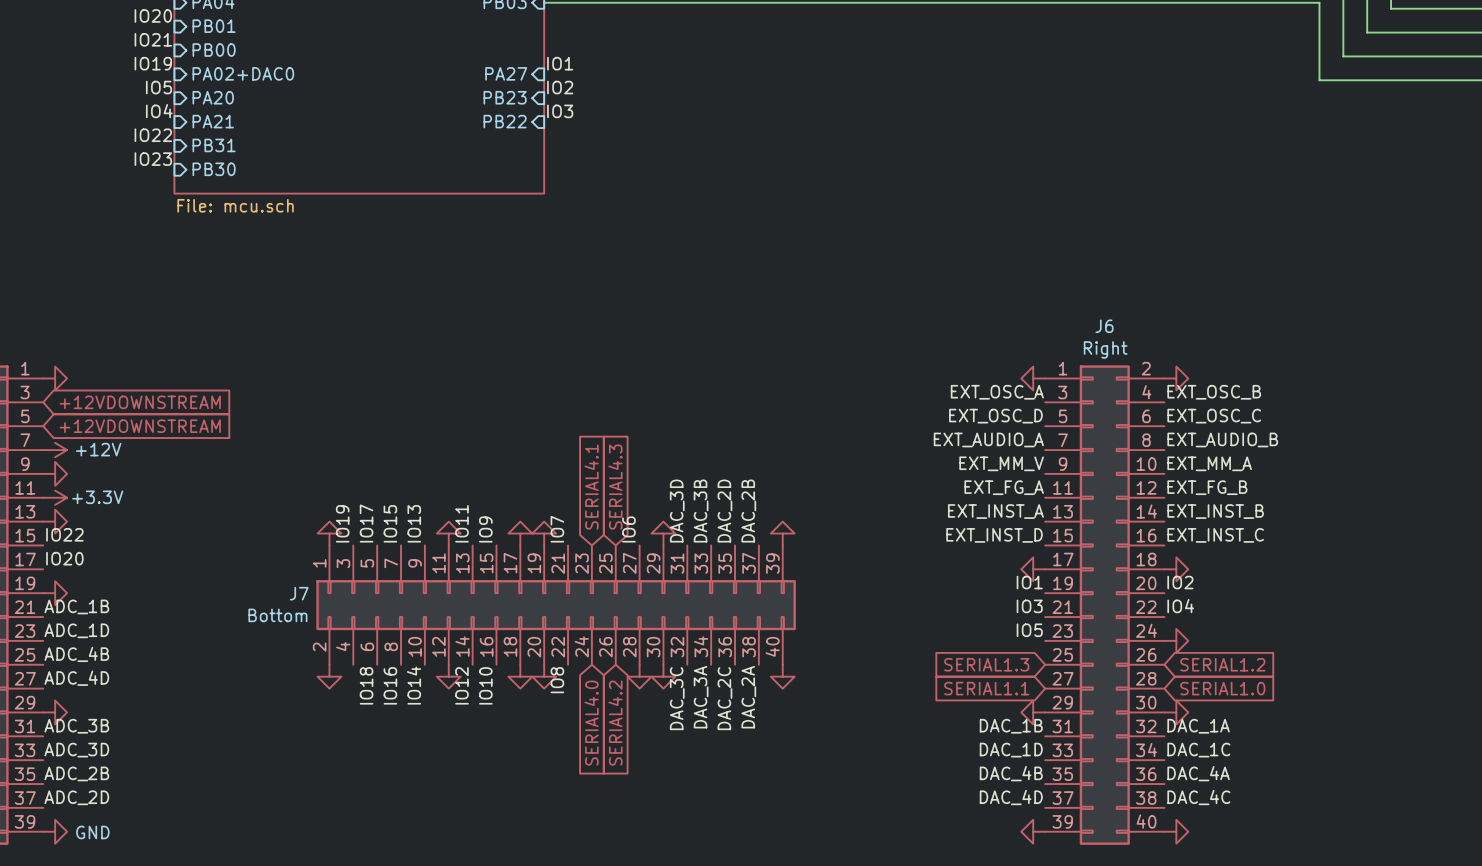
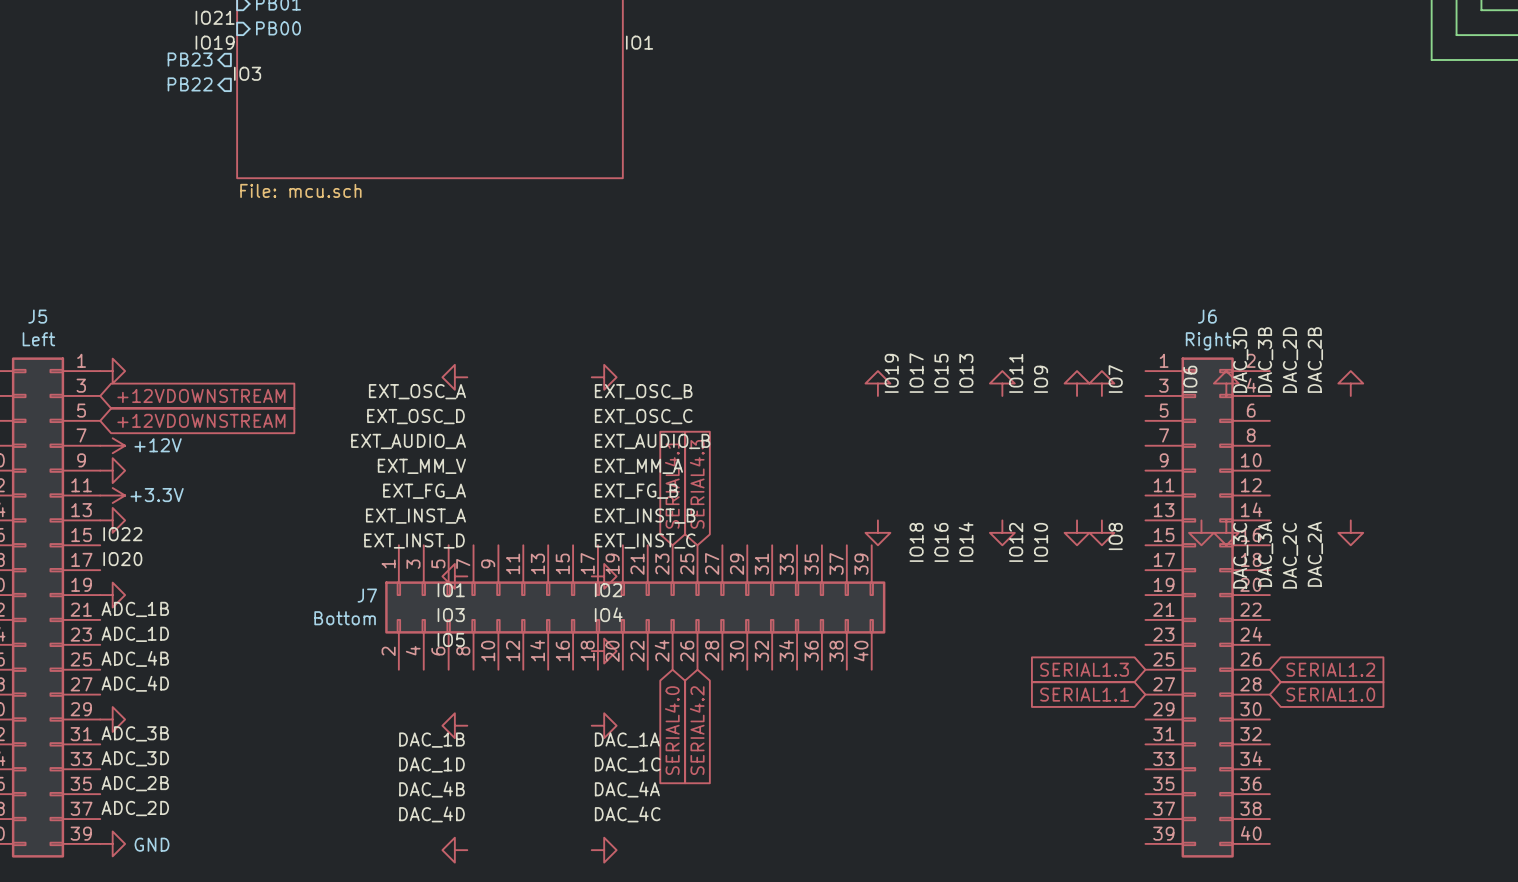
sheet pin: PA02+DAC0 (243, 73) -> none
sheet pin: PA27 (506, 73) -> none
sheet pin: none -> PB23 (190, 59)
label: IO5 (158, 87) -> IO3 (247, 73)
label: IO2 (560, 87) -> none
sheet pin: PA20 (213, 97) -> none
sheet pin: PB23 (505, 97) -> none
sheet pin: none -> PB22 (190, 84)
label: IO4 (159, 111) -> none
label: IO3 (560, 111) -> none
sheet pin: PA21 (213, 121) -> none
sheet pin: PB22 (505, 121) -> none
label: IO22 (153, 135) -> none
sheet pin: PB31 (214, 145) -> none
label: IO23 (153, 159) -> none
sheet pin: PB30 (214, 169) -> none
label: none -> DAC_3D (1240, 360)
label: none -> DAC_2D (1290, 360)
label: none -> DAC_2B (1315, 360)
power symbol: (1033, 378) -> none
power symbol: (1176, 378) -> none
label: none -> IO19 (891, 373)
label: none -> IO17 (916, 373)
label: none -> IO15 (941, 373)
label: none -> IO13 (966, 373)
label: none -> IO11 (1016, 373)
power symbol: none -> (454, 377)
power symbol: none -> (604, 377)
label: none -> IO9 (1041, 379)
label: none -> IO7 (1115, 378)
label: none -> IO6 (1190, 379)
power symbol: none -> (877, 383)
power symbol: none -> (1002, 383)
power symbol: none -> (1077, 383)
power symbol: none -> (1101, 383)
power symbol: none -> (1226, 383)
power symbol: none -> (1350, 383)
label: EXT_OSC_A (997, 392) -> none
label: EXT_OSC_B (1214, 392) -> DAC_3B (1265, 360)
label: none -> EXT_OSC_A (417, 391)
label: none -> EXT_OSC_B (643, 391)
label: EXT_OSC_D (995, 416) -> none
label: EXT_OSC_C (1214, 416) -> none
label: none -> EXT_OSC_D (415, 416)
label: none -> EXT_OSC_C (643, 416)
label: EXT_AUDIO_A (988, 439) -> none
label: EXT_AUDIO_B (1222, 439) -> none
label: none -> EXT_AUDIO_A (408, 441)
label: none -> EXT_AUDIO_B (652, 441)
label: EXT_MM_V (1001, 463) -> none
label: EXT_MM_A (1209, 463) -> none
label: none -> EXT_MM_V (421, 466)
label: none -> EXT_MM_A (638, 466)
label: EXT_FG_A (1004, 487) -> none
label: EXT_FG_B (1207, 487) -> none
label: none -> EXT_FG_A (424, 491)
label: none -> EXT_FG_B (636, 491)
label: DAC_3D (677, 511) -> none
label: DAC_3B (701, 511) -> none
label: DAC_2D (724, 511) -> none
label: DAC_2B (748, 511) -> none
label: EXT_INST_A (995, 511) -> none
label: EXT_INST_B (1215, 511) -> DAC_3A (1265, 554)
label: none -> EXT_INST_A (415, 516)
label: none -> EXT_INST_B (645, 516)
label: IO19 (342, 523) -> none
label: IO17 (366, 523) -> none
label: IO15 (390, 523) -> EXT_INST_D (414, 541)
label: IO13 (414, 523) -> none
label: IO11 (461, 523) -> none
label: IO9 (485, 529) -> none
label: IO7 (557, 529) -> none
label: IO6 (628, 529) -> none
power symbol: (329, 533) -> none
power symbol: (448, 533) -> none
power symbol: (520, 533) -> none
power symbol: (544, 533) -> none
power symbol: (663, 533) -> none
power symbol rotation: 0° (782, 533) -> 180° (877, 532)
power symbol: none -> (1002, 532)
power symbol: none -> (1077, 532)
power symbol: none -> (1101, 532)
power symbol: none -> (1201, 532)
power symbol: none -> (1226, 532)
power symbol: none -> (1350, 532)
label: EXT_INST_D (994, 535) -> none
label: EXT_INST_C (1215, 535) -> none
label: none -> IO8 (1115, 536)
label: none -> EXT_INST_C (645, 541)
label: none -> IO18 (916, 542)
label: none -> IO16 (941, 542)
label: none -> IO14 (966, 542)
label: none -> IO12 (1016, 542)
label: none -> IO10 (1041, 542)
label: none -> DAC_2A (1315, 554)
label: none -> DAC_3C (1240, 555)
label: none -> DAC_2C (1290, 555)
power symbol: (1033, 569) -> none
power symbol: (1176, 569) -> none
power symbol: none -> (454, 576)
power symbol: none -> (604, 576)
label: IO1 (1029, 582) -> none
label: IO2 (1180, 582) -> none
label: none -> IO1 (451, 590)
label: none -> IO2 (608, 590)
label: IO3 (1029, 606) -> none
label: IO4 (1180, 606) -> none
label: none -> IO3 (451, 615)
label: none -> IO4 (608, 614)
label: IO5 (1029, 630) -> none
label: none -> IO5 (451, 639)
power symbol: (1176, 640) -> none
power symbol: none -> (604, 651)
power symbol: (329, 676) -> none
power symbol: (448, 676) -> none
power symbol: (520, 676) -> none
power symbol: (544, 676) -> none
power symbol: (639, 676) -> none
power symbol: (663, 676) -> none
power symbol: (782, 676) -> none
label: IO8 (557, 680) -> none
label: IO18 (366, 685) -> none
label: IO16 (390, 685) -> none
label: IO14 (413, 685) -> none
label: IO12 (461, 685) -> none
label: IO10 (485, 685) -> none
label: DAC_3A (701, 697) -> none
label: DAC_2A (748, 697) -> none
label: DAC_3C (677, 698) -> none
label: DAC_2C (724, 698) -> none
power symbol: (1033, 712) -> none
power symbol: (1176, 712) -> none
power symbol: none -> (454, 725)
power symbol: none -> (604, 725)
label: DAC_1B (1011, 726) -> none
label: DAC_1A (1198, 726) -> none
label: none -> DAC_1B (431, 740)
label: none -> DAC_1A (627, 740)
label: DAC_1D (1011, 750) -> none
label: DAC_1C (1198, 750) -> none
label: none -> DAC_1D (431, 764)
label: none -> DAC_1C (627, 764)
label: DAC_4B (1011, 773) -> none
label: DAC_4A (1198, 773) -> none
label: none -> DAC_4B (431, 789)
label: none -> DAC_4A (627, 789)
label: DAC_4D (1011, 797) -> none
label: DAC_4C (1198, 797) -> none
label: none -> DAC_4D (431, 814)
label: none -> DAC_4C (627, 814)
power symbol: (1033, 831) -> none
power symbol: (1176, 831) -> none
power symbol: none -> (454, 850)
power symbol: none -> (604, 850)

